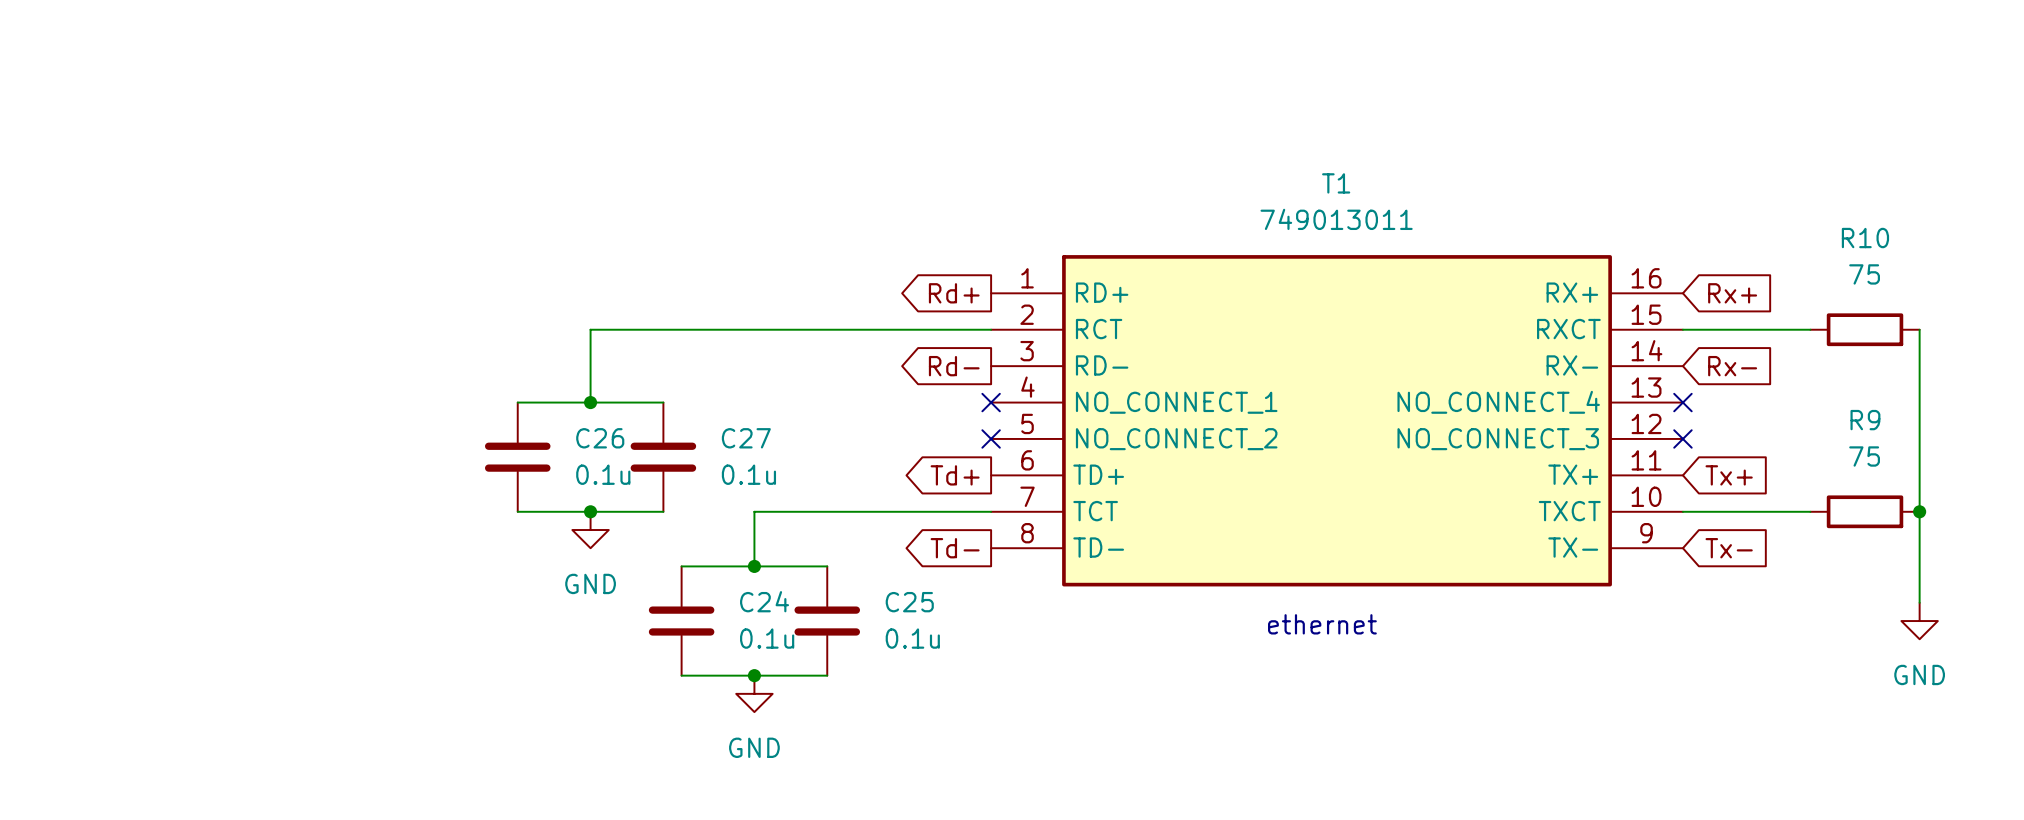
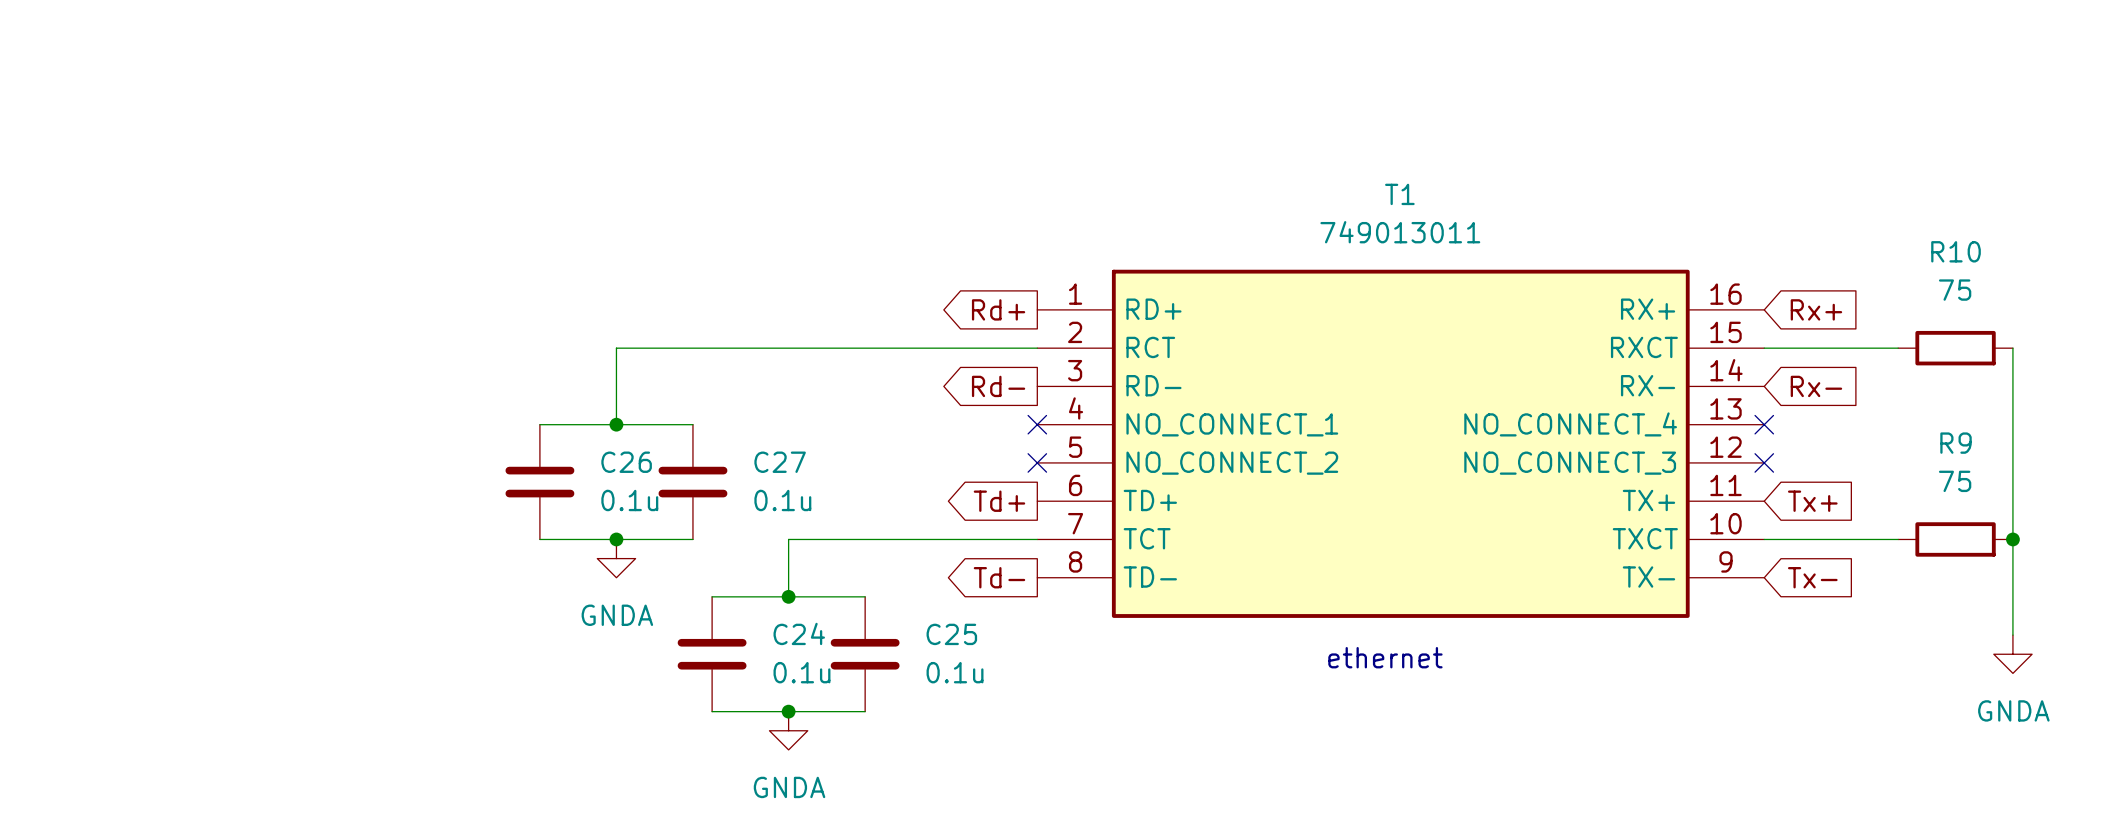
power symbol: GND (590, 530) -> GNDA (616, 558)
power symbol: GND (1919, 621) -> GNDA (2012, 654)
power symbol: GND (754, 693) -> GNDA (788, 730)

